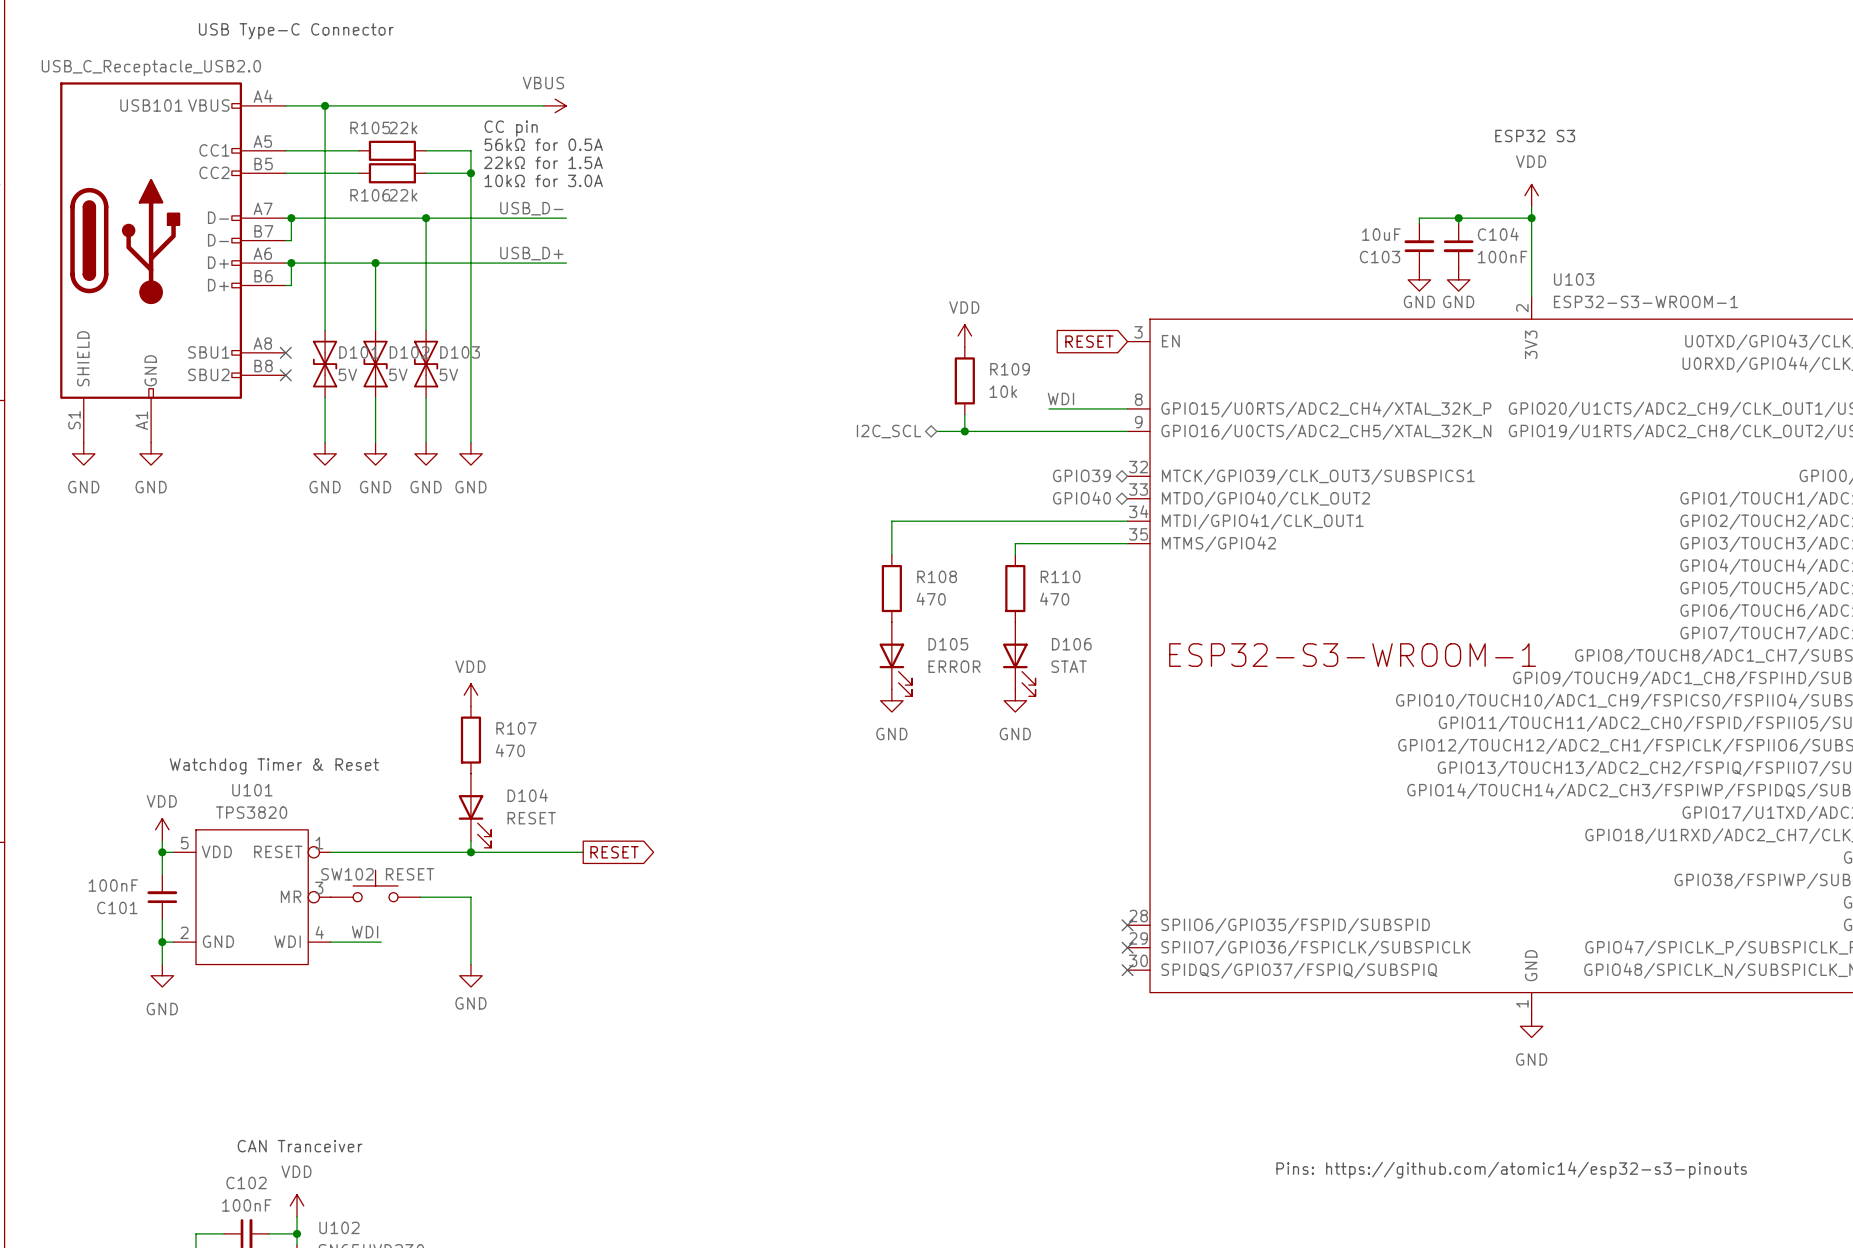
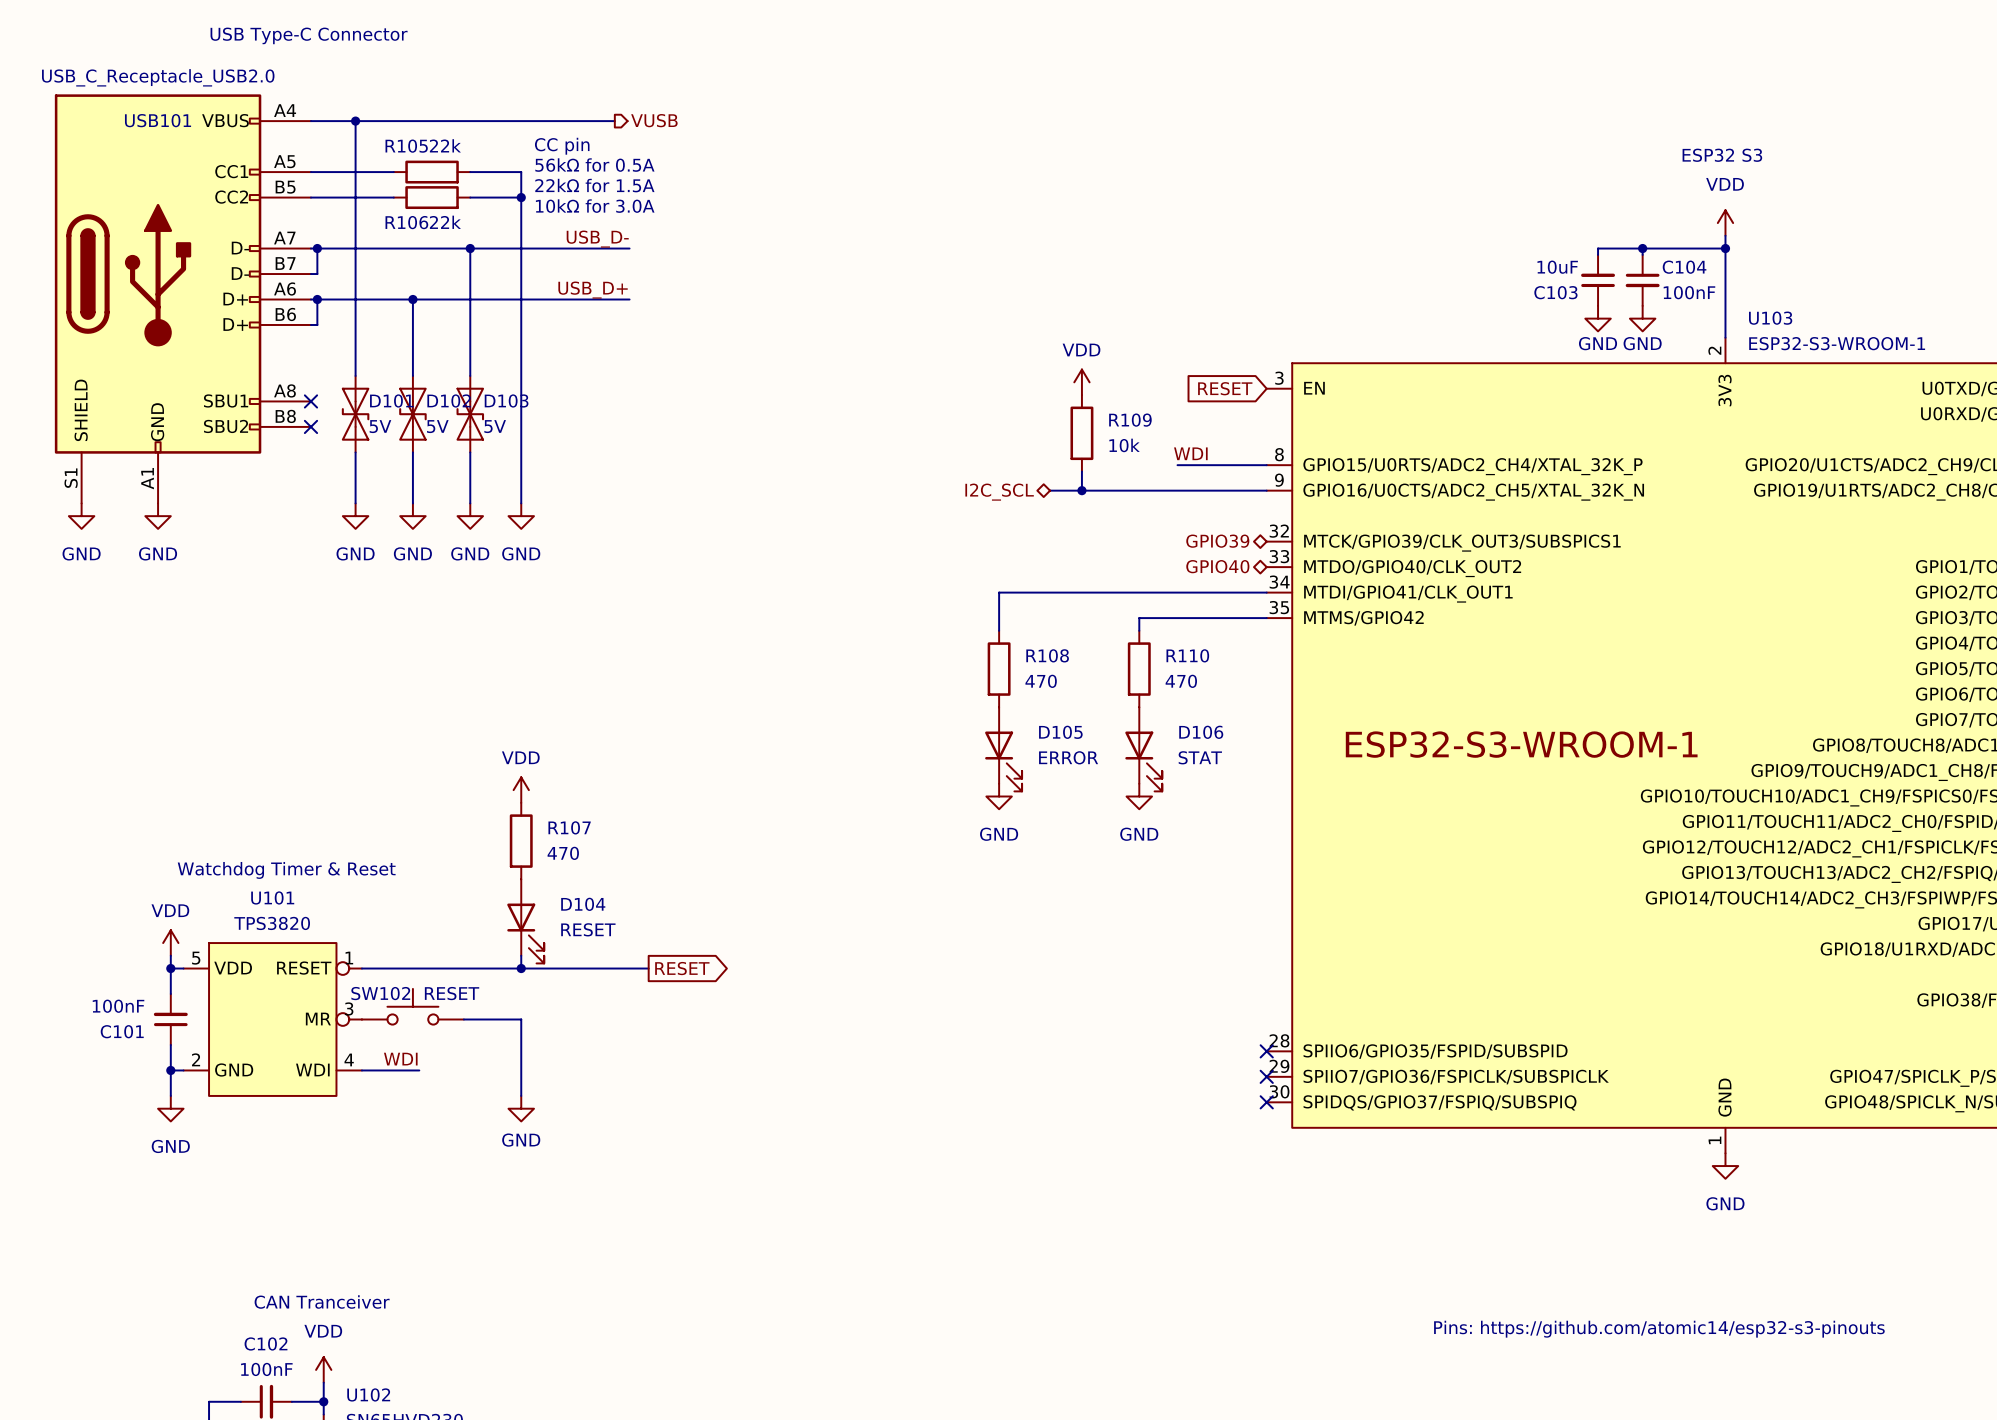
power symbol: VBUS (555, 105) -> none
hierarchical label: none -> VUSB (654, 120)

